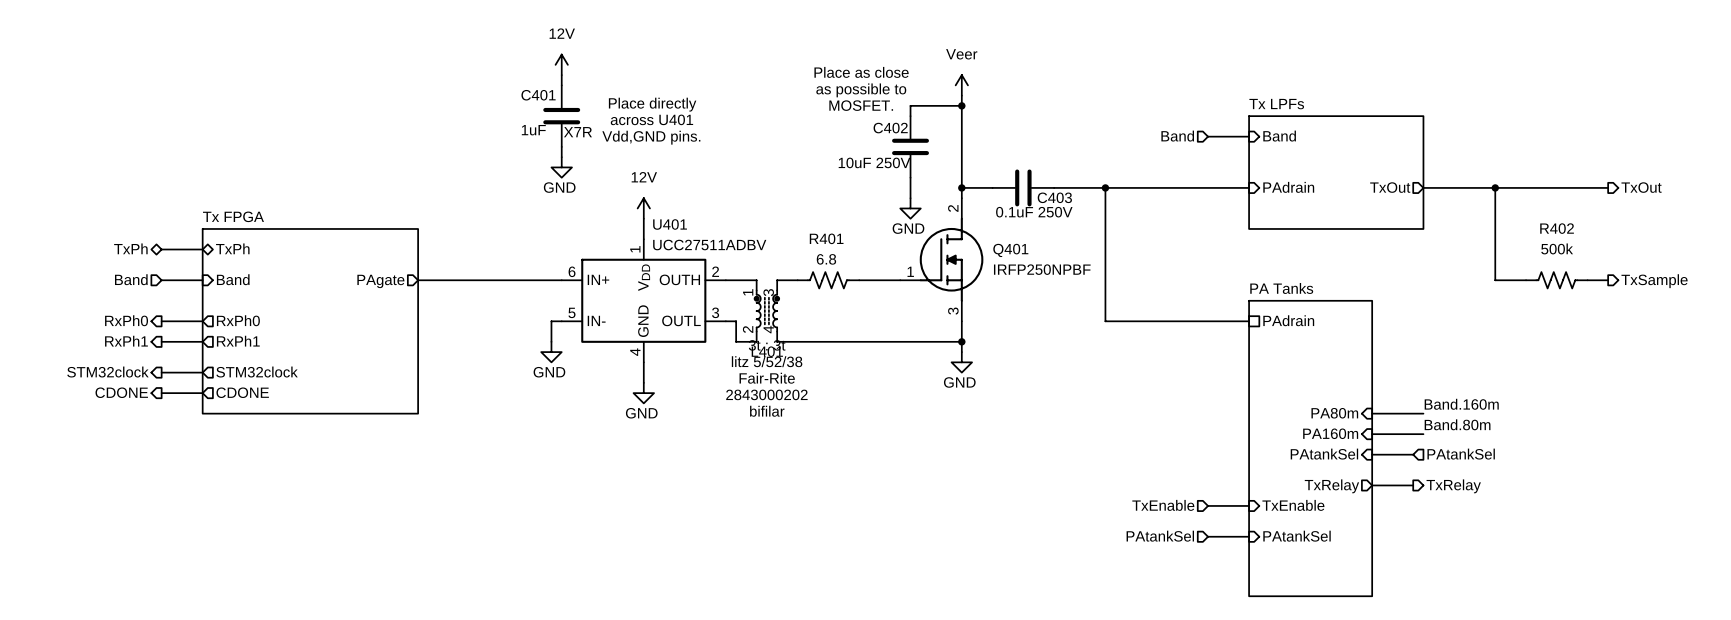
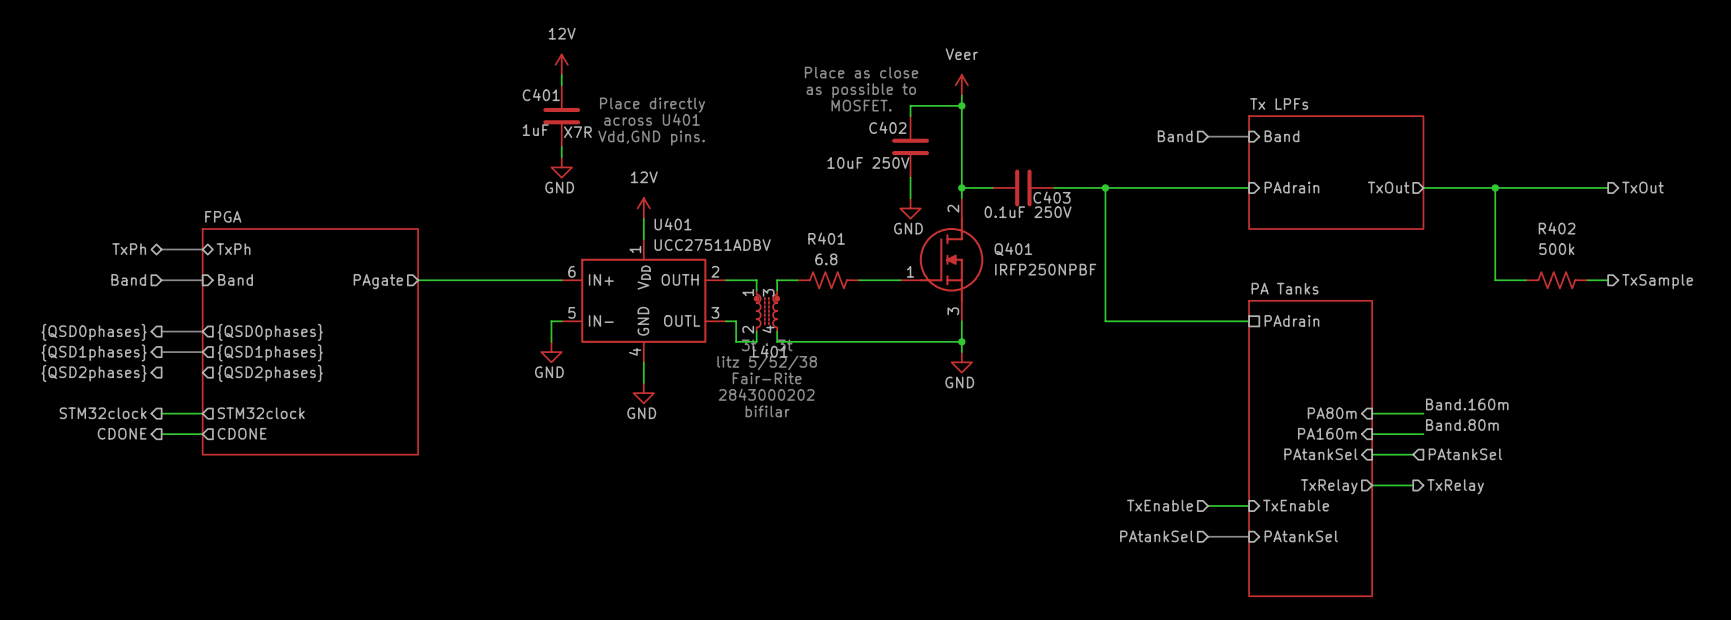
hierarchical label: RxPh0 (126, 320) -> none
sheet pin: RxPh0 (238, 320) -> none
wire: (161, 321) (202, 321) -> none
sheet Tx FPGA: (310, 321) -> none
bus: none -> (161, 331) (202, 331)
hierarchical label: none -> {QSD0phases} (94, 332)
sheet pin: none -> {QSD0phases} (270, 332)
hierarchical label: RxPh1 (126, 341) -> none
wire: (161, 341) (202, 341) -> none
sheet pin: RxPh1 (238, 341) -> none
sheet FPGA: none -> (310, 341)
hierarchical label: none -> {QSD1phases} (94, 352)
bus: none -> (161, 352) (202, 352)
sheet pin: none -> {QSD1phases} (270, 352)
hierarchical label: STM32clock (107, 372) -> {QSD2phases} (94, 373)
wire: (161, 372) (202, 372) -> (161, 413) (202, 413)
sheet pin: STM32clock (257, 372) -> {QSD2phases} (270, 373)
hierarchical label position: CDONE (121, 392) -> CDONE (122, 433)
sheet pin position: CDONE (242, 392) -> CDONE (242, 433)
wire: (161, 393) (202, 393) -> (161, 434) (202, 434)
hierarchical label: none -> STM32clock (103, 413)
sheet pin: none -> STM32clock (261, 413)

